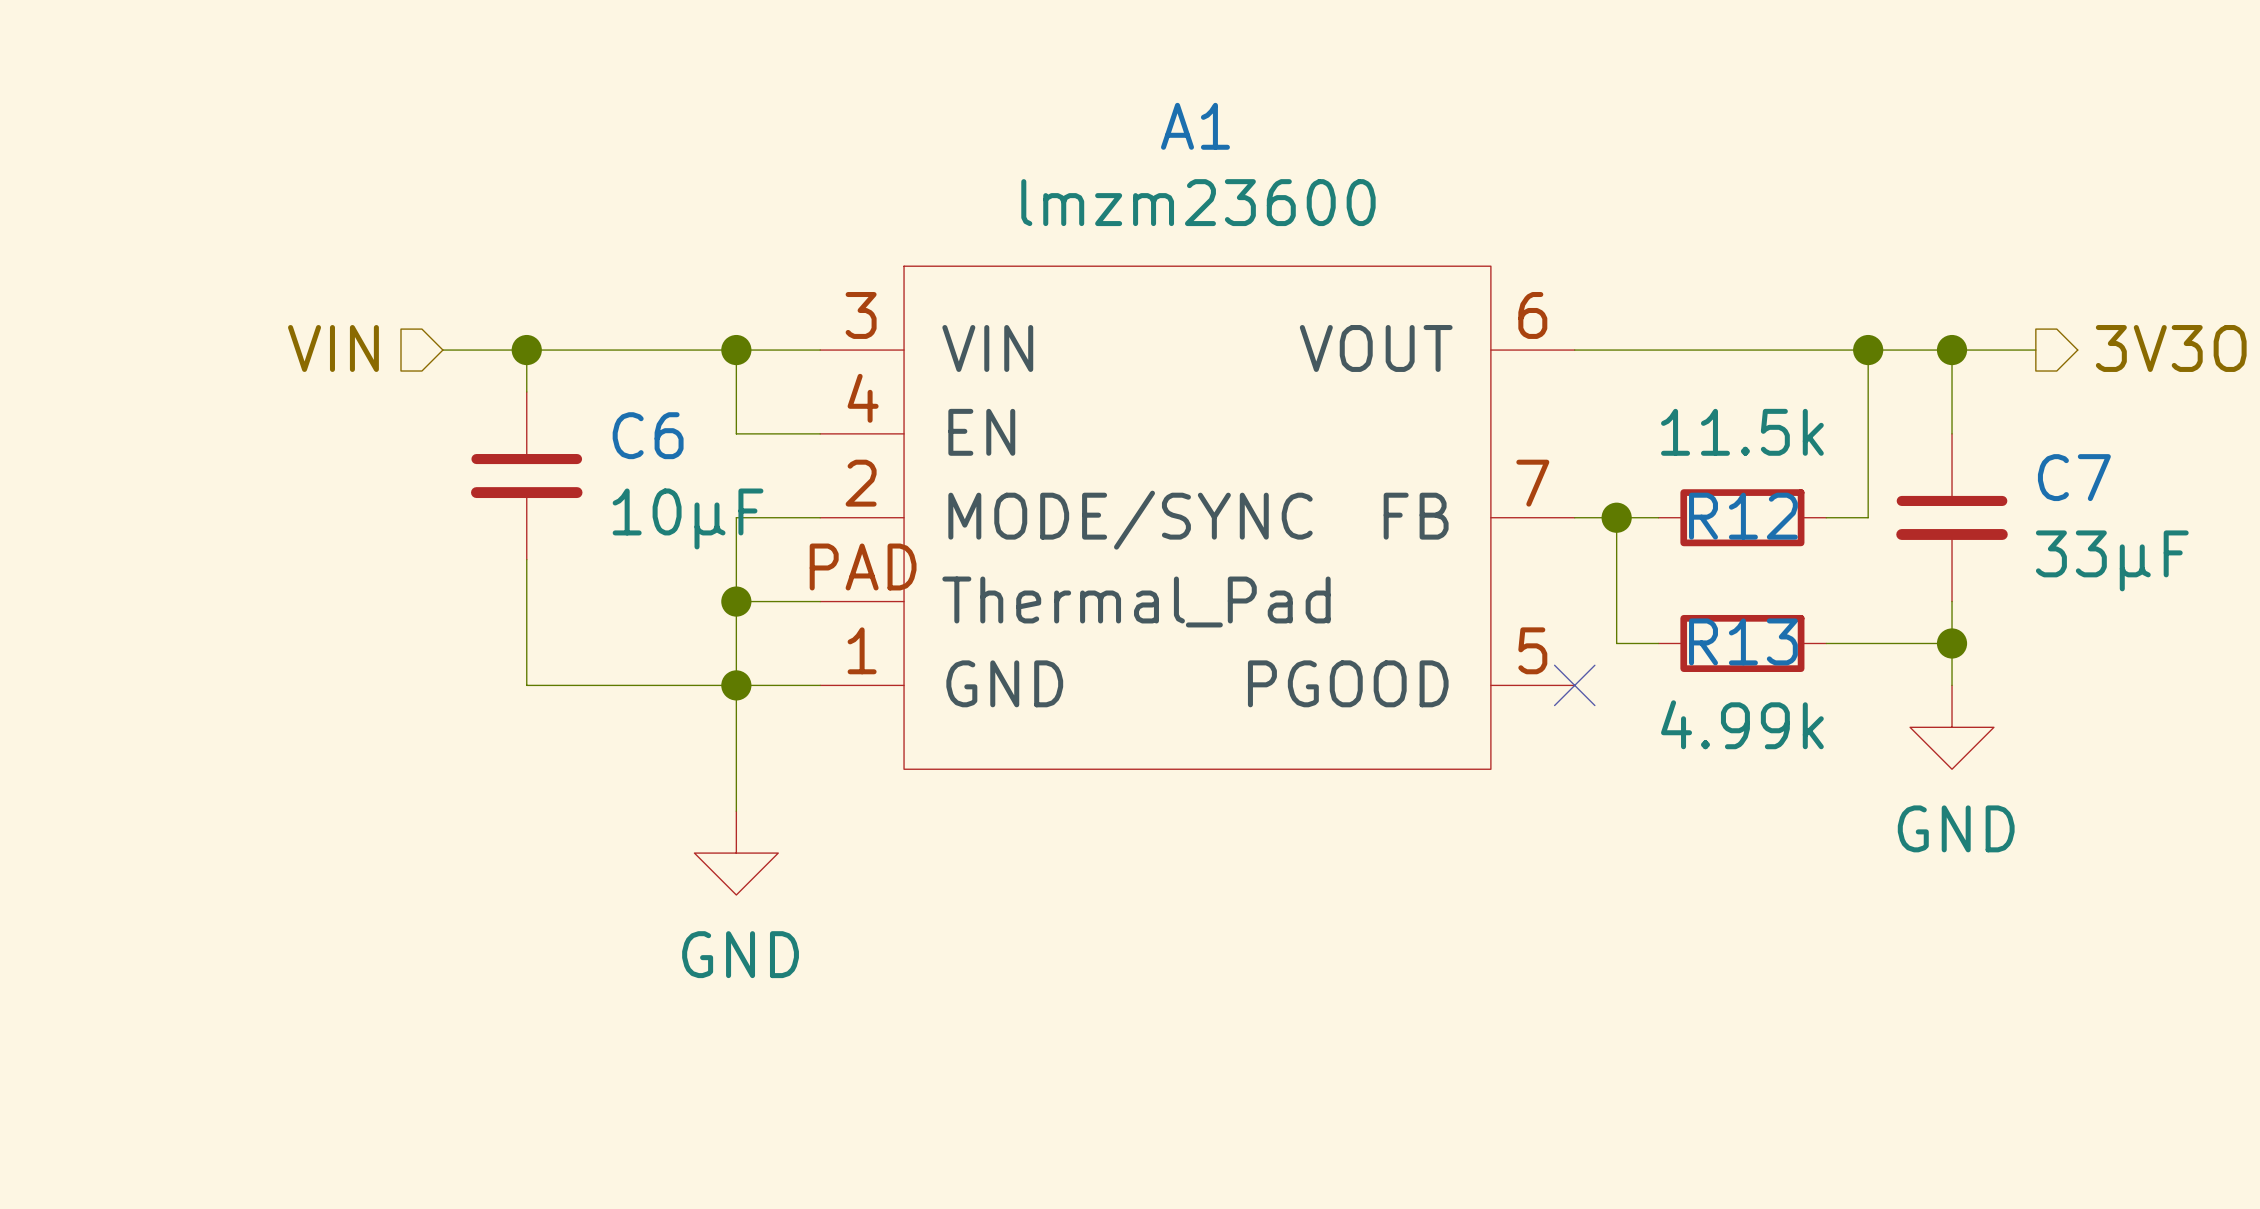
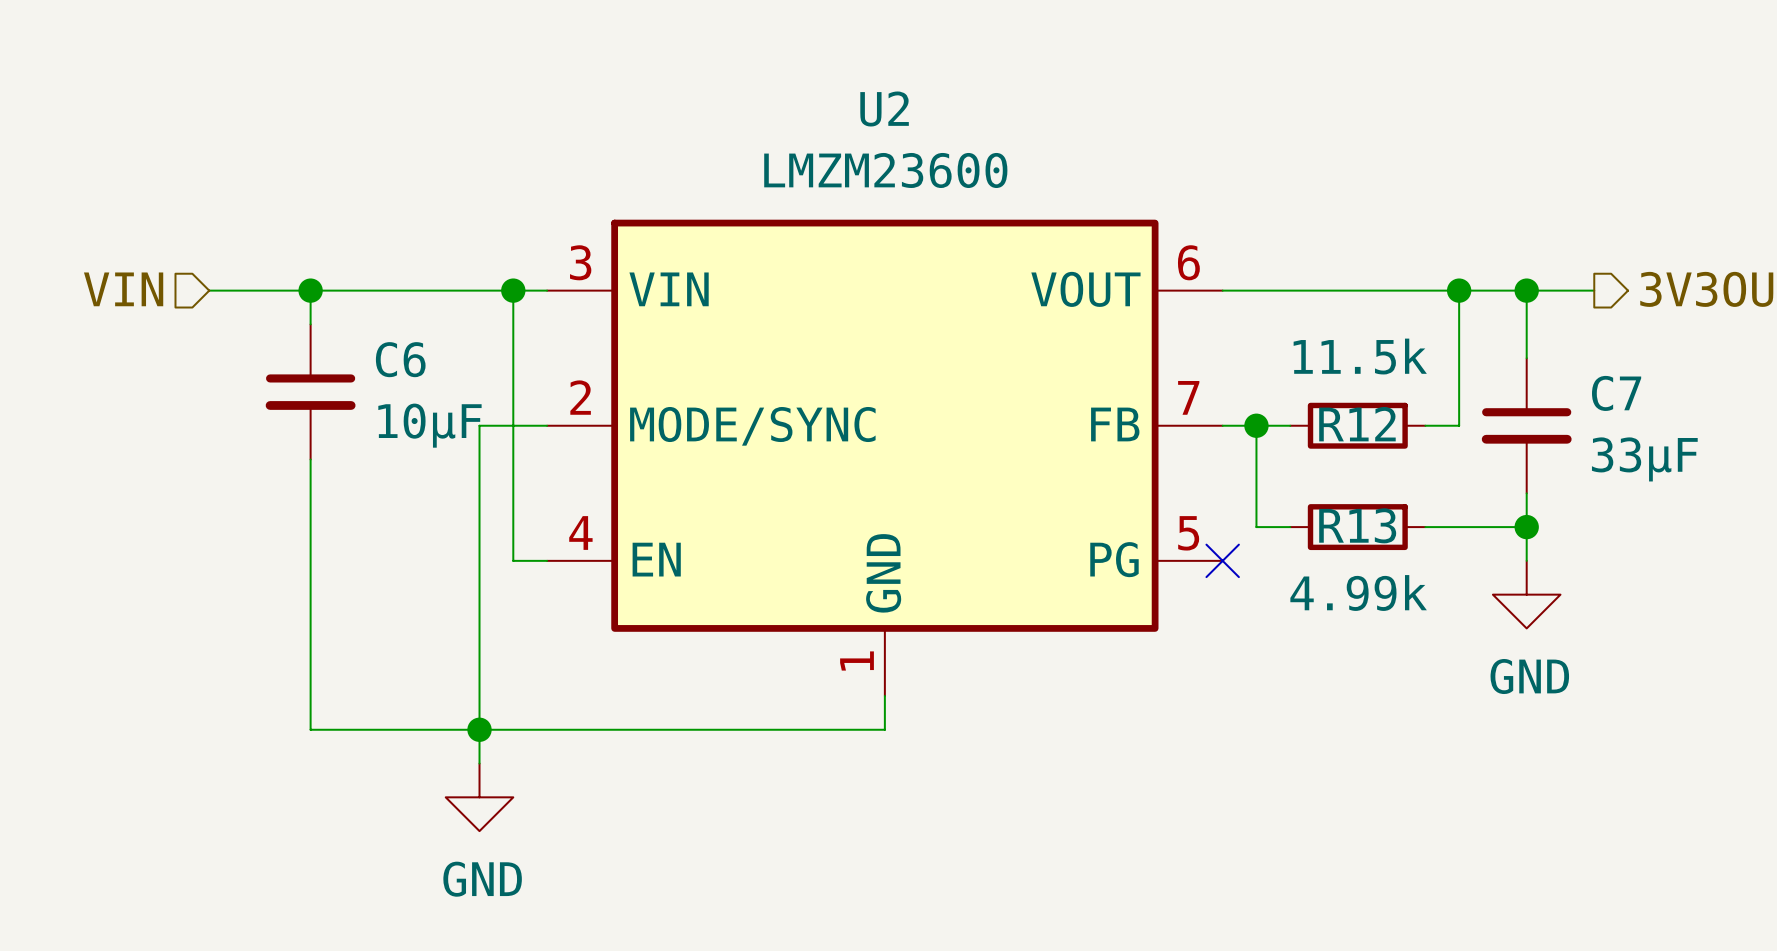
hierarchical label position: VIN (333, 348) -> VIN (123, 289)
wire: none -> (209, 290) (310, 290) (310, 324)
junction: none -> (310, 290)
wire: (526, 350) (526, 391) -> none
junction: (526, 350) -> none
junction position: (736, 350) -> (513, 290)
wire: (820, 350) (736, 350) (736, 433) (820, 433) -> none
C6 position: (526, 475) -> (310, 391)
wire: none -> (547, 425) (479, 425) (479, 763)
wire: (820, 517) (736, 517) (736, 811) -> none
A1: lmzm23600 (1197, 517) -> none
U2: none -> LMZM23600 (884, 457)
wire: none -> (310, 459) (310, 729) (884, 729) (884, 695)
wire: (526, 559) (526, 685) (694, 685) -> (513, 290) (513, 560)
wire: (736, 601) (820, 601) -> none
junction: (736, 601) -> none
junction: (736, 685) -> none
power symbol position: GND (736, 853) -> GND (479, 797)
junction: none -> (479, 729)

